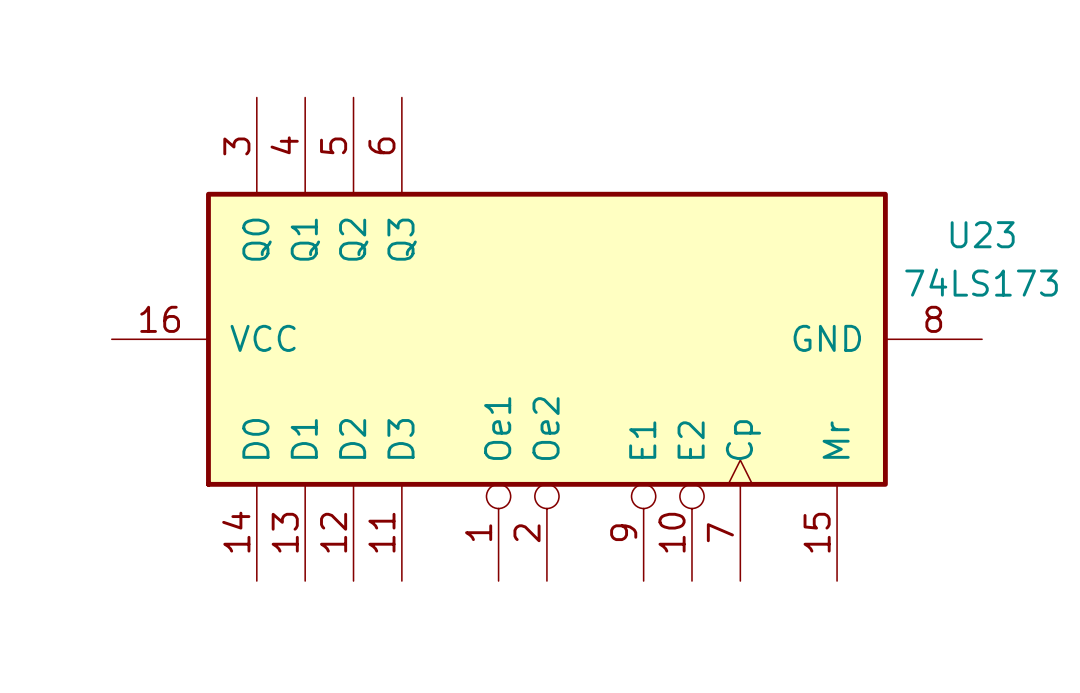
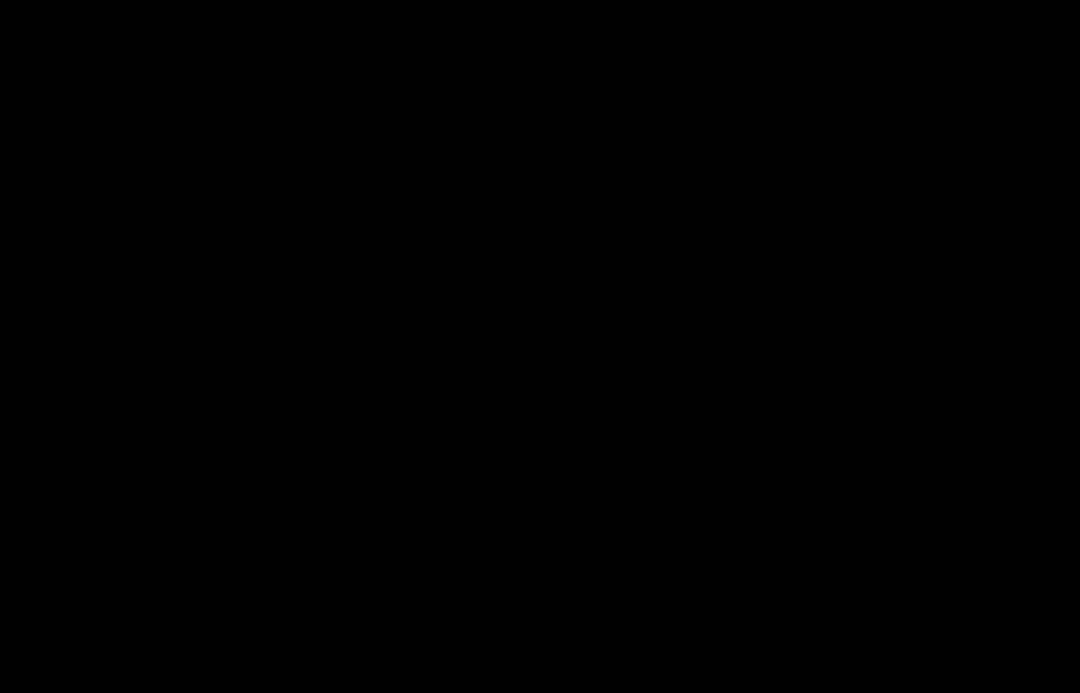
U23: 74LS173 (546, 339) -> none

